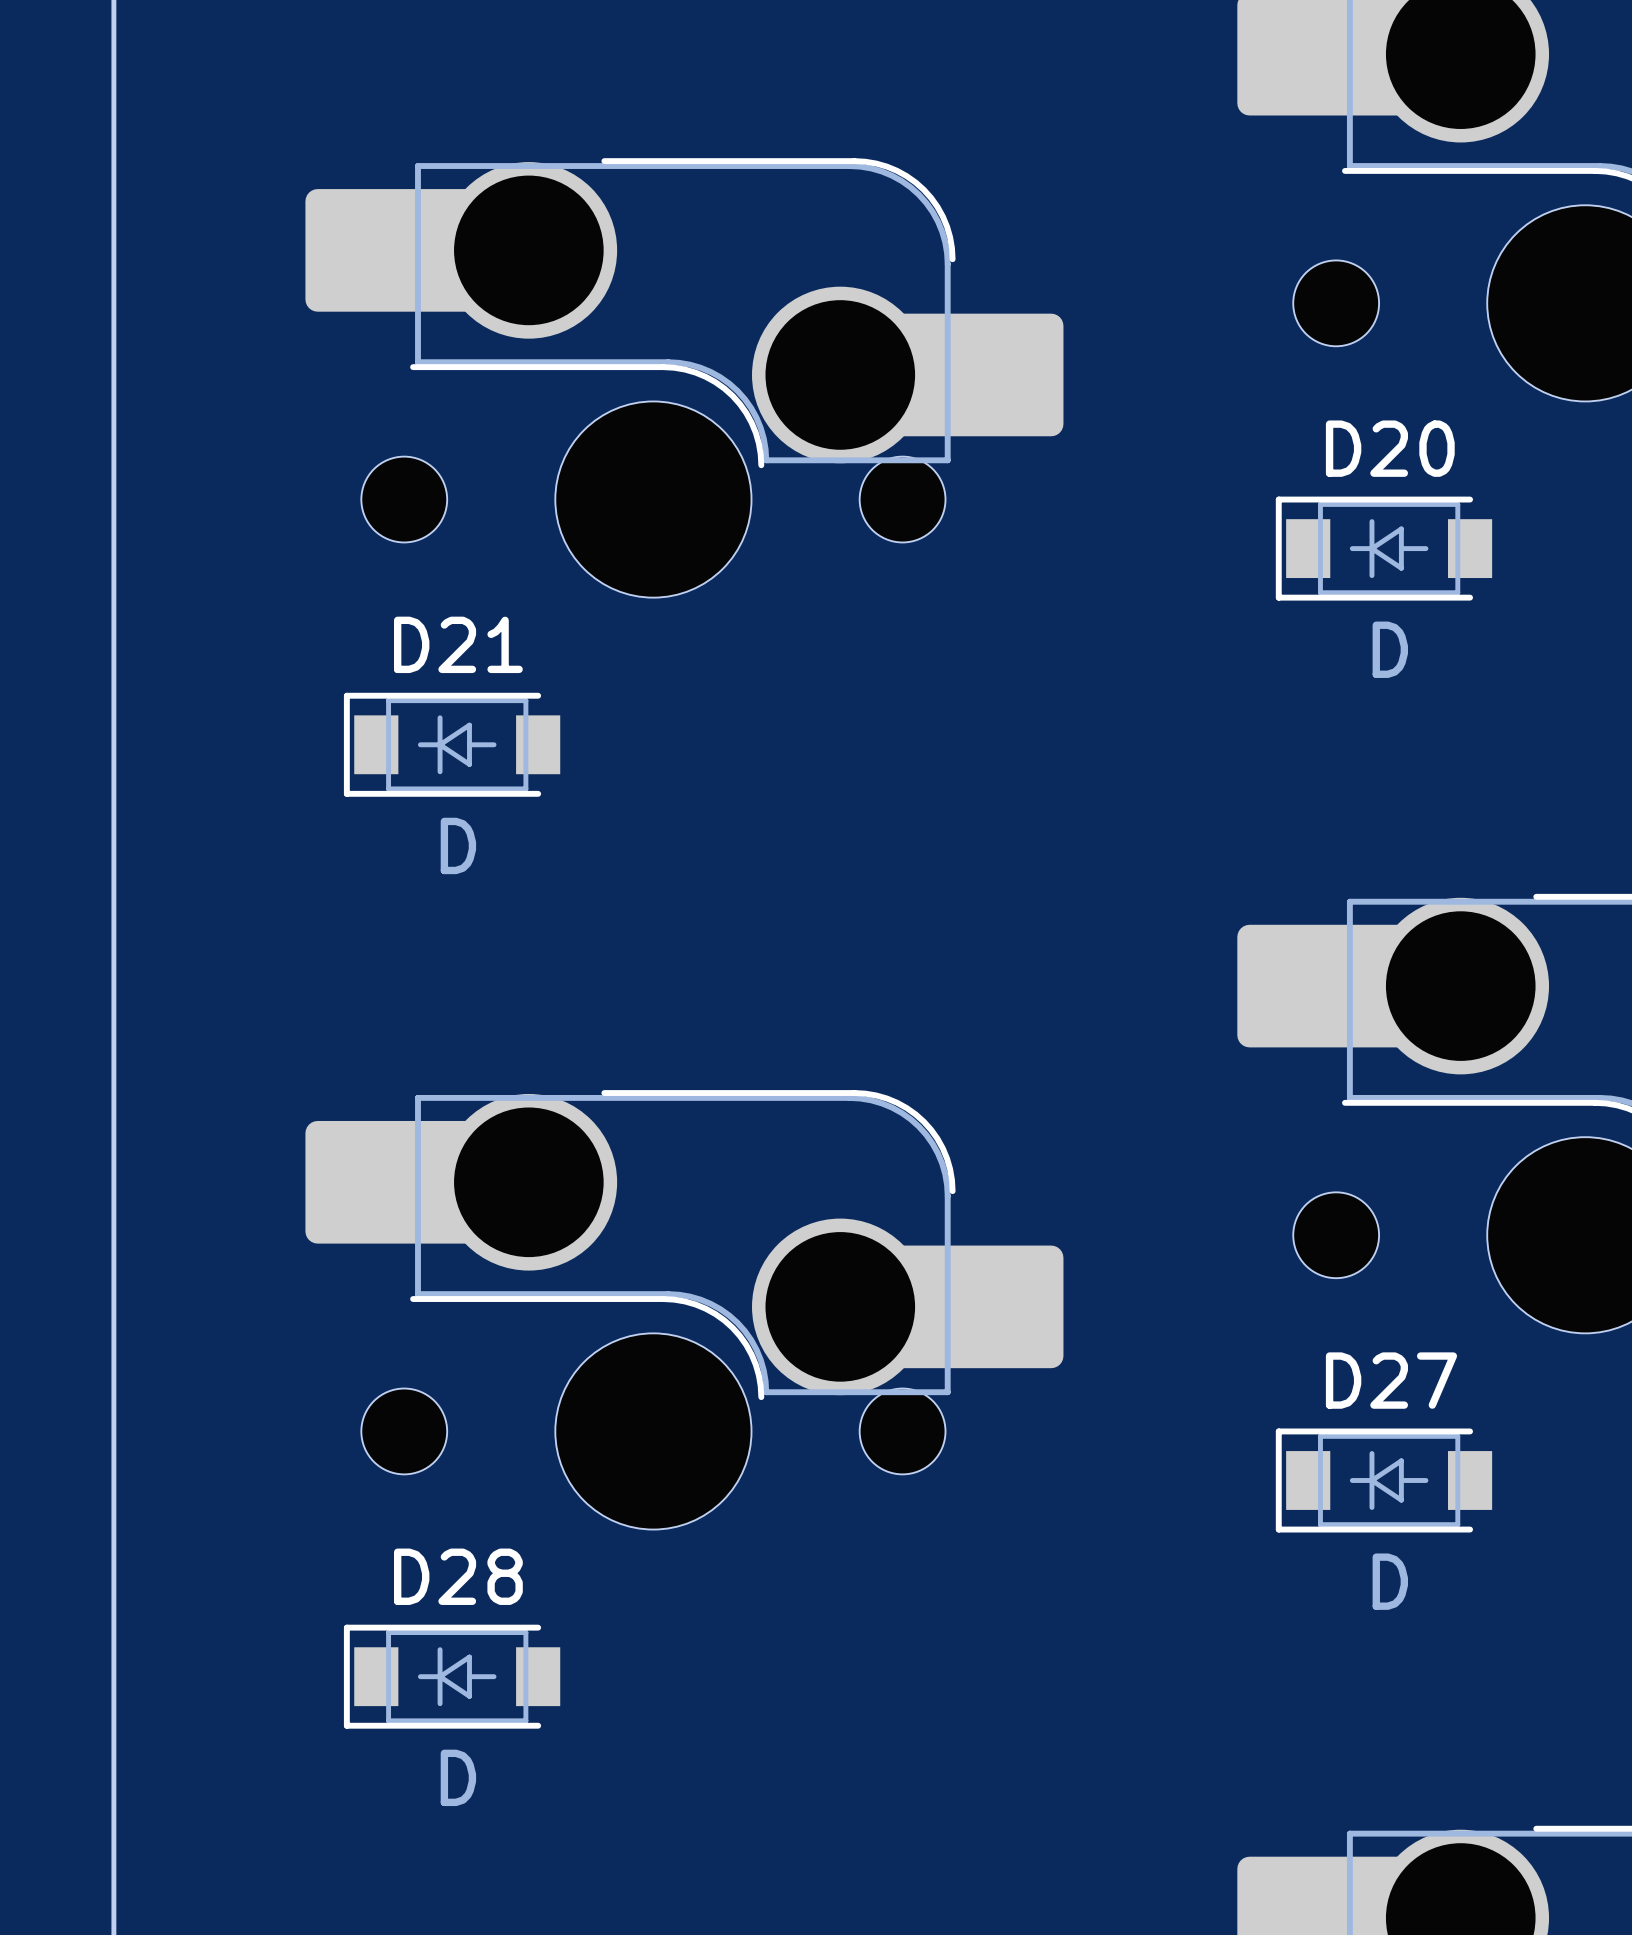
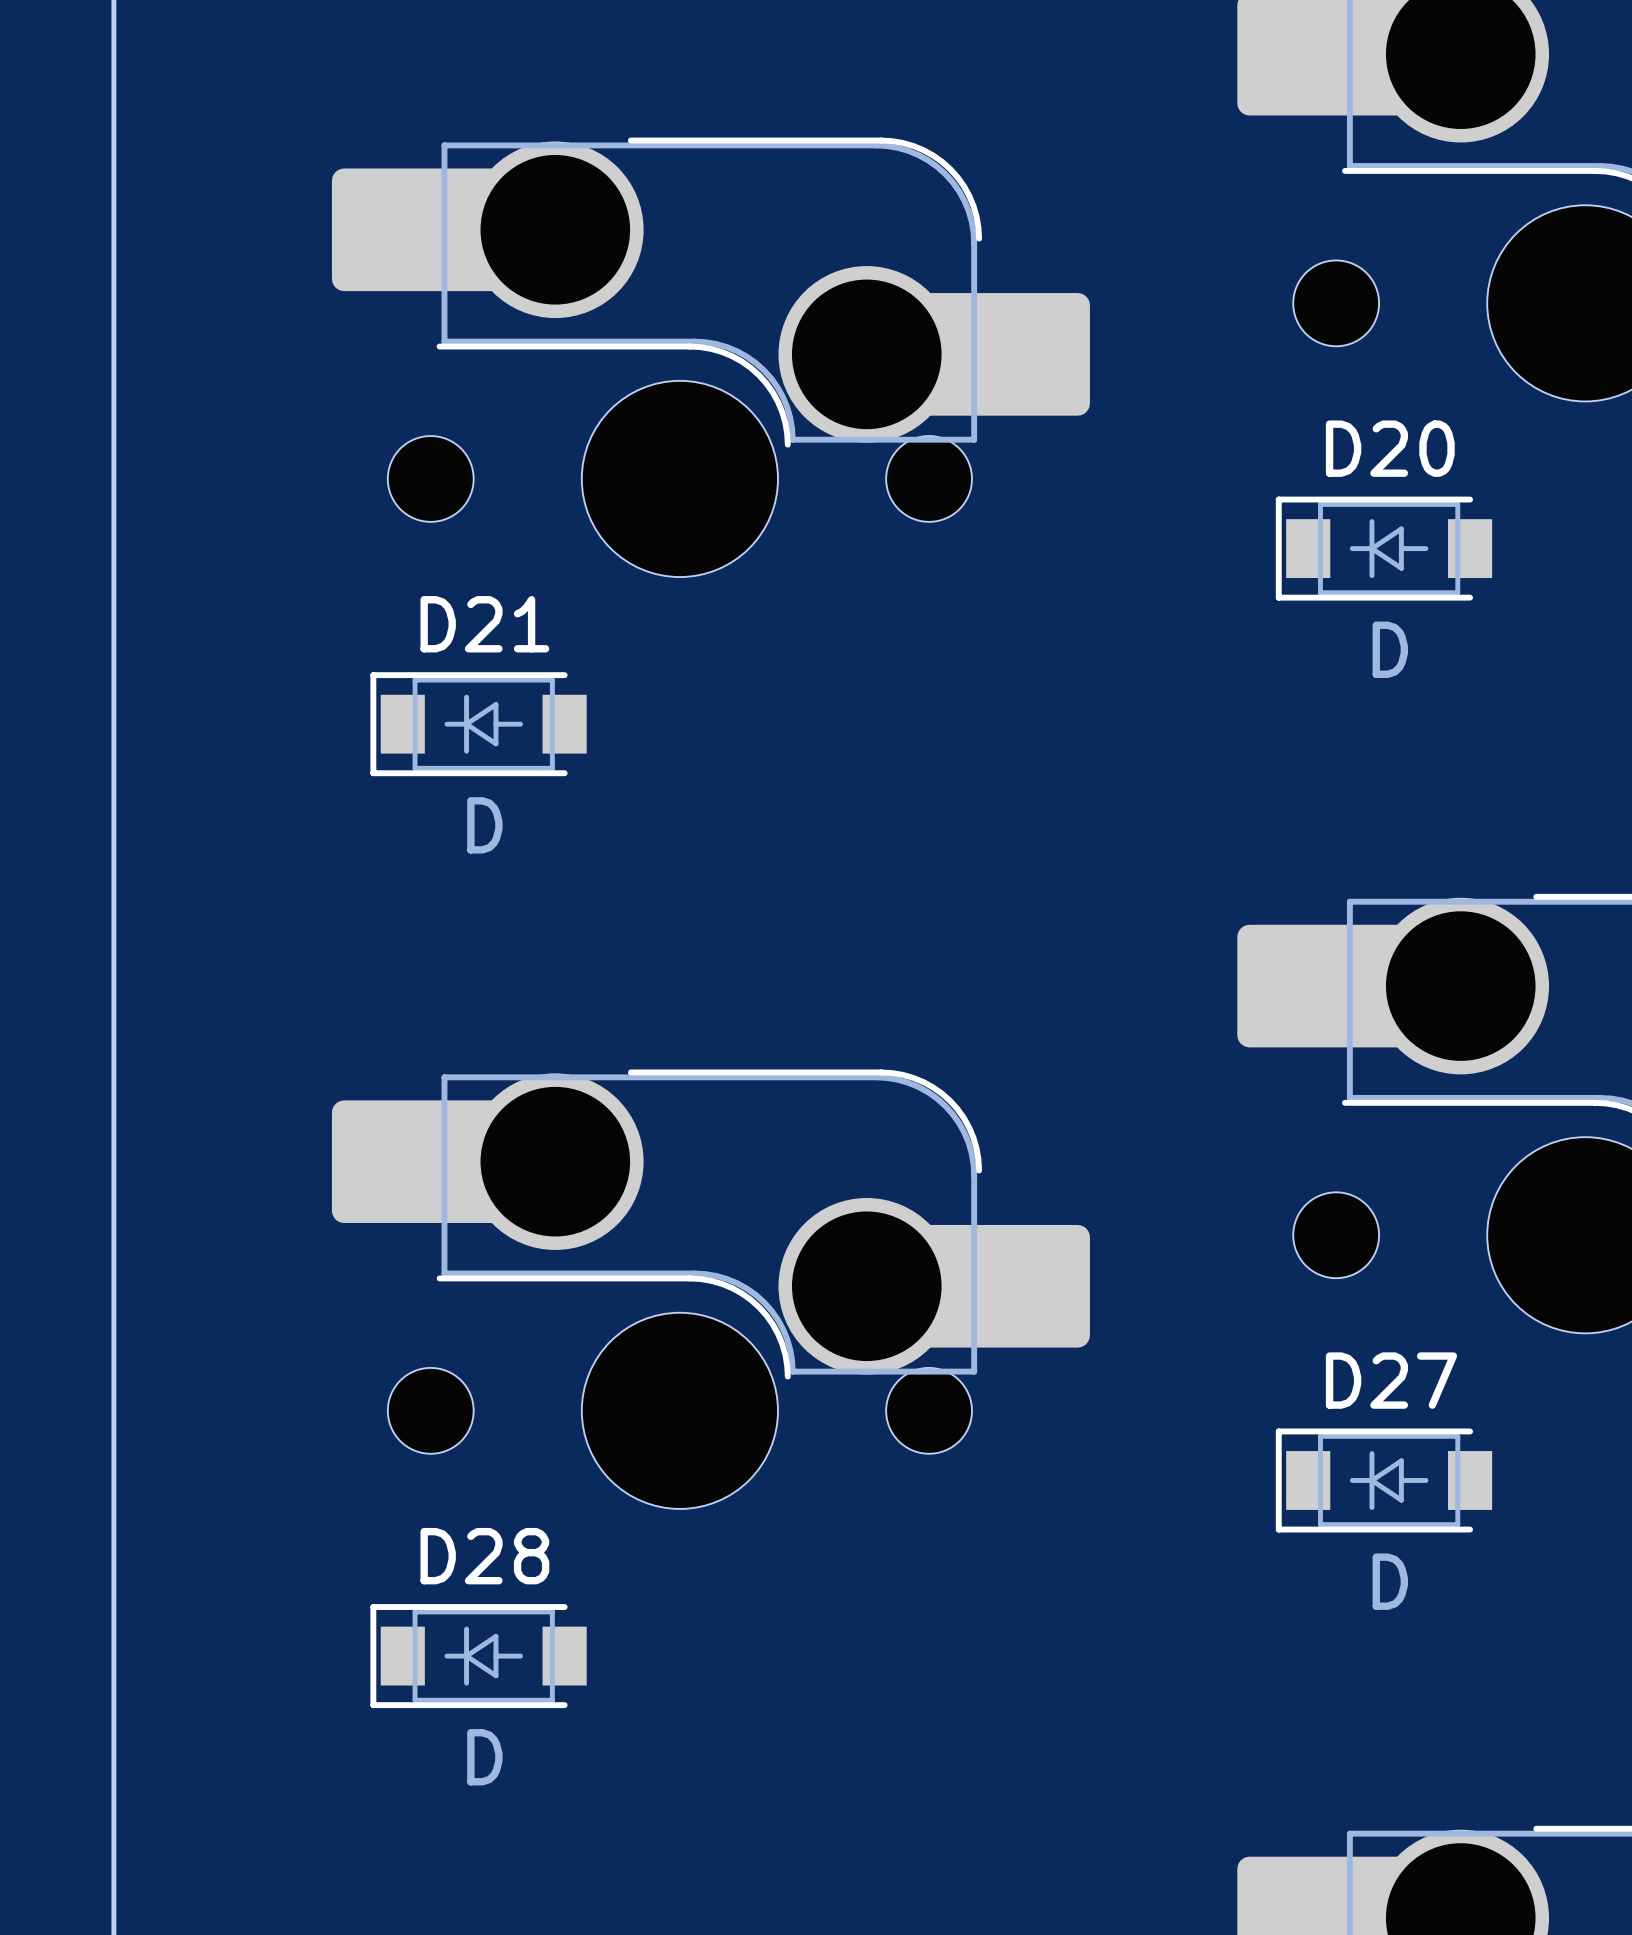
part position: (684, 377) -> (710, 357)
D21 position: (452, 744) -> (478, 724)
part position: (684, 1309) -> (710, 1289)
D28 position: (452, 1676) -> (478, 1656)

